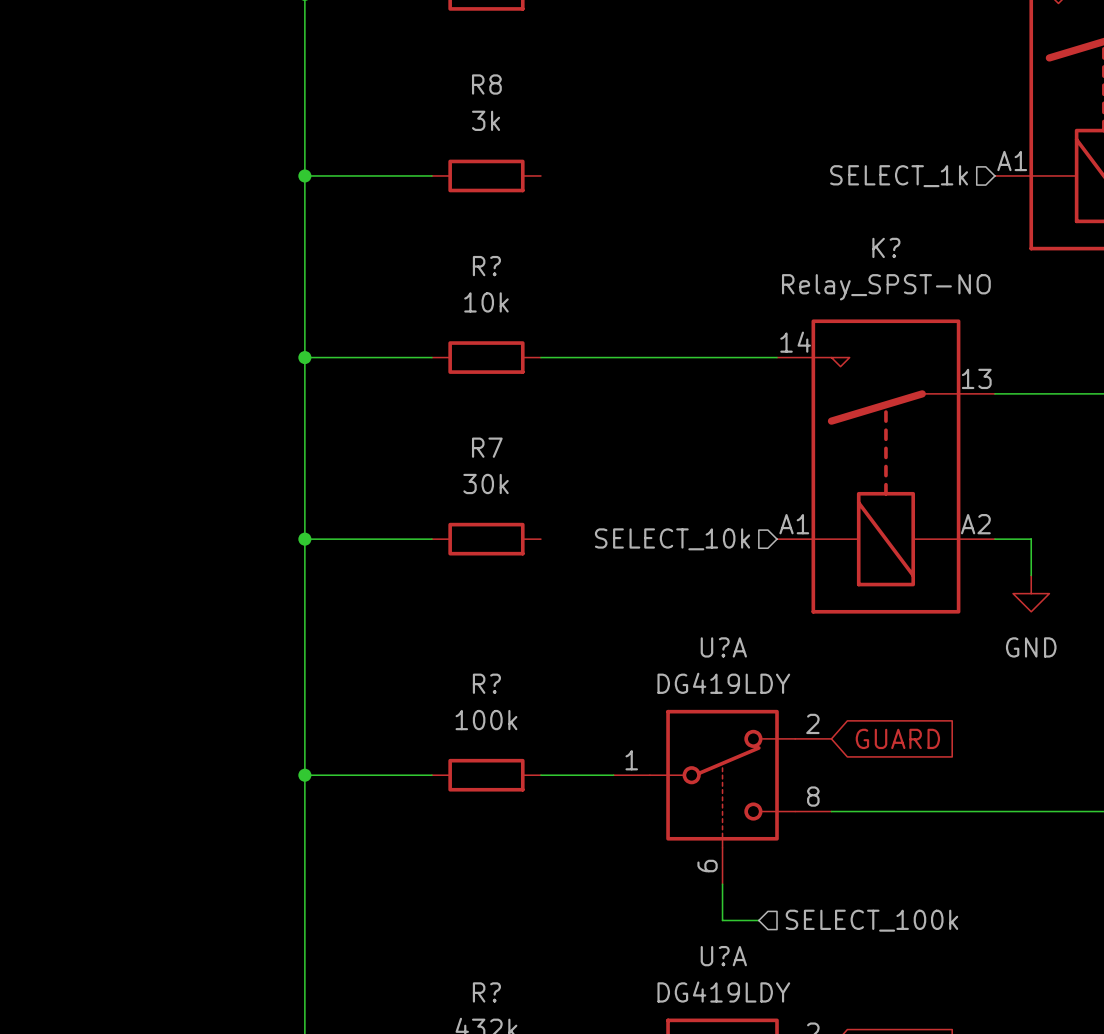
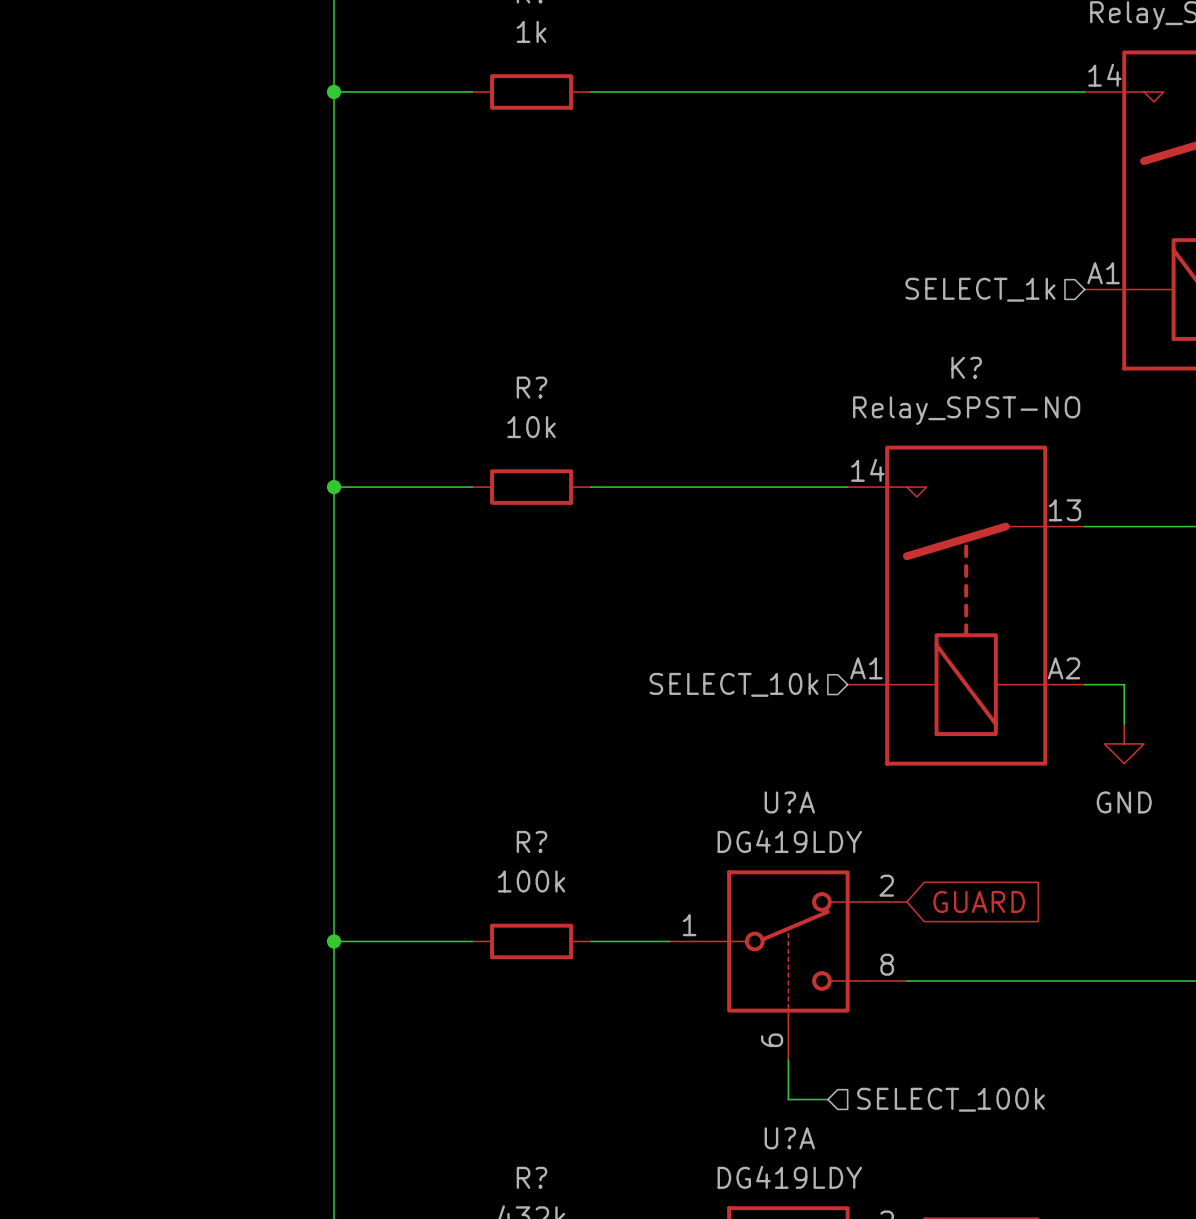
wire: (304, 175) (431, 175) -> none
junction: (304, 175) -> none
R8: 3k (486, 175) -> none
wire: (304, 539) (431, 539) -> none
junction: (304, 539) -> none
R7: 30k (486, 539) -> none

